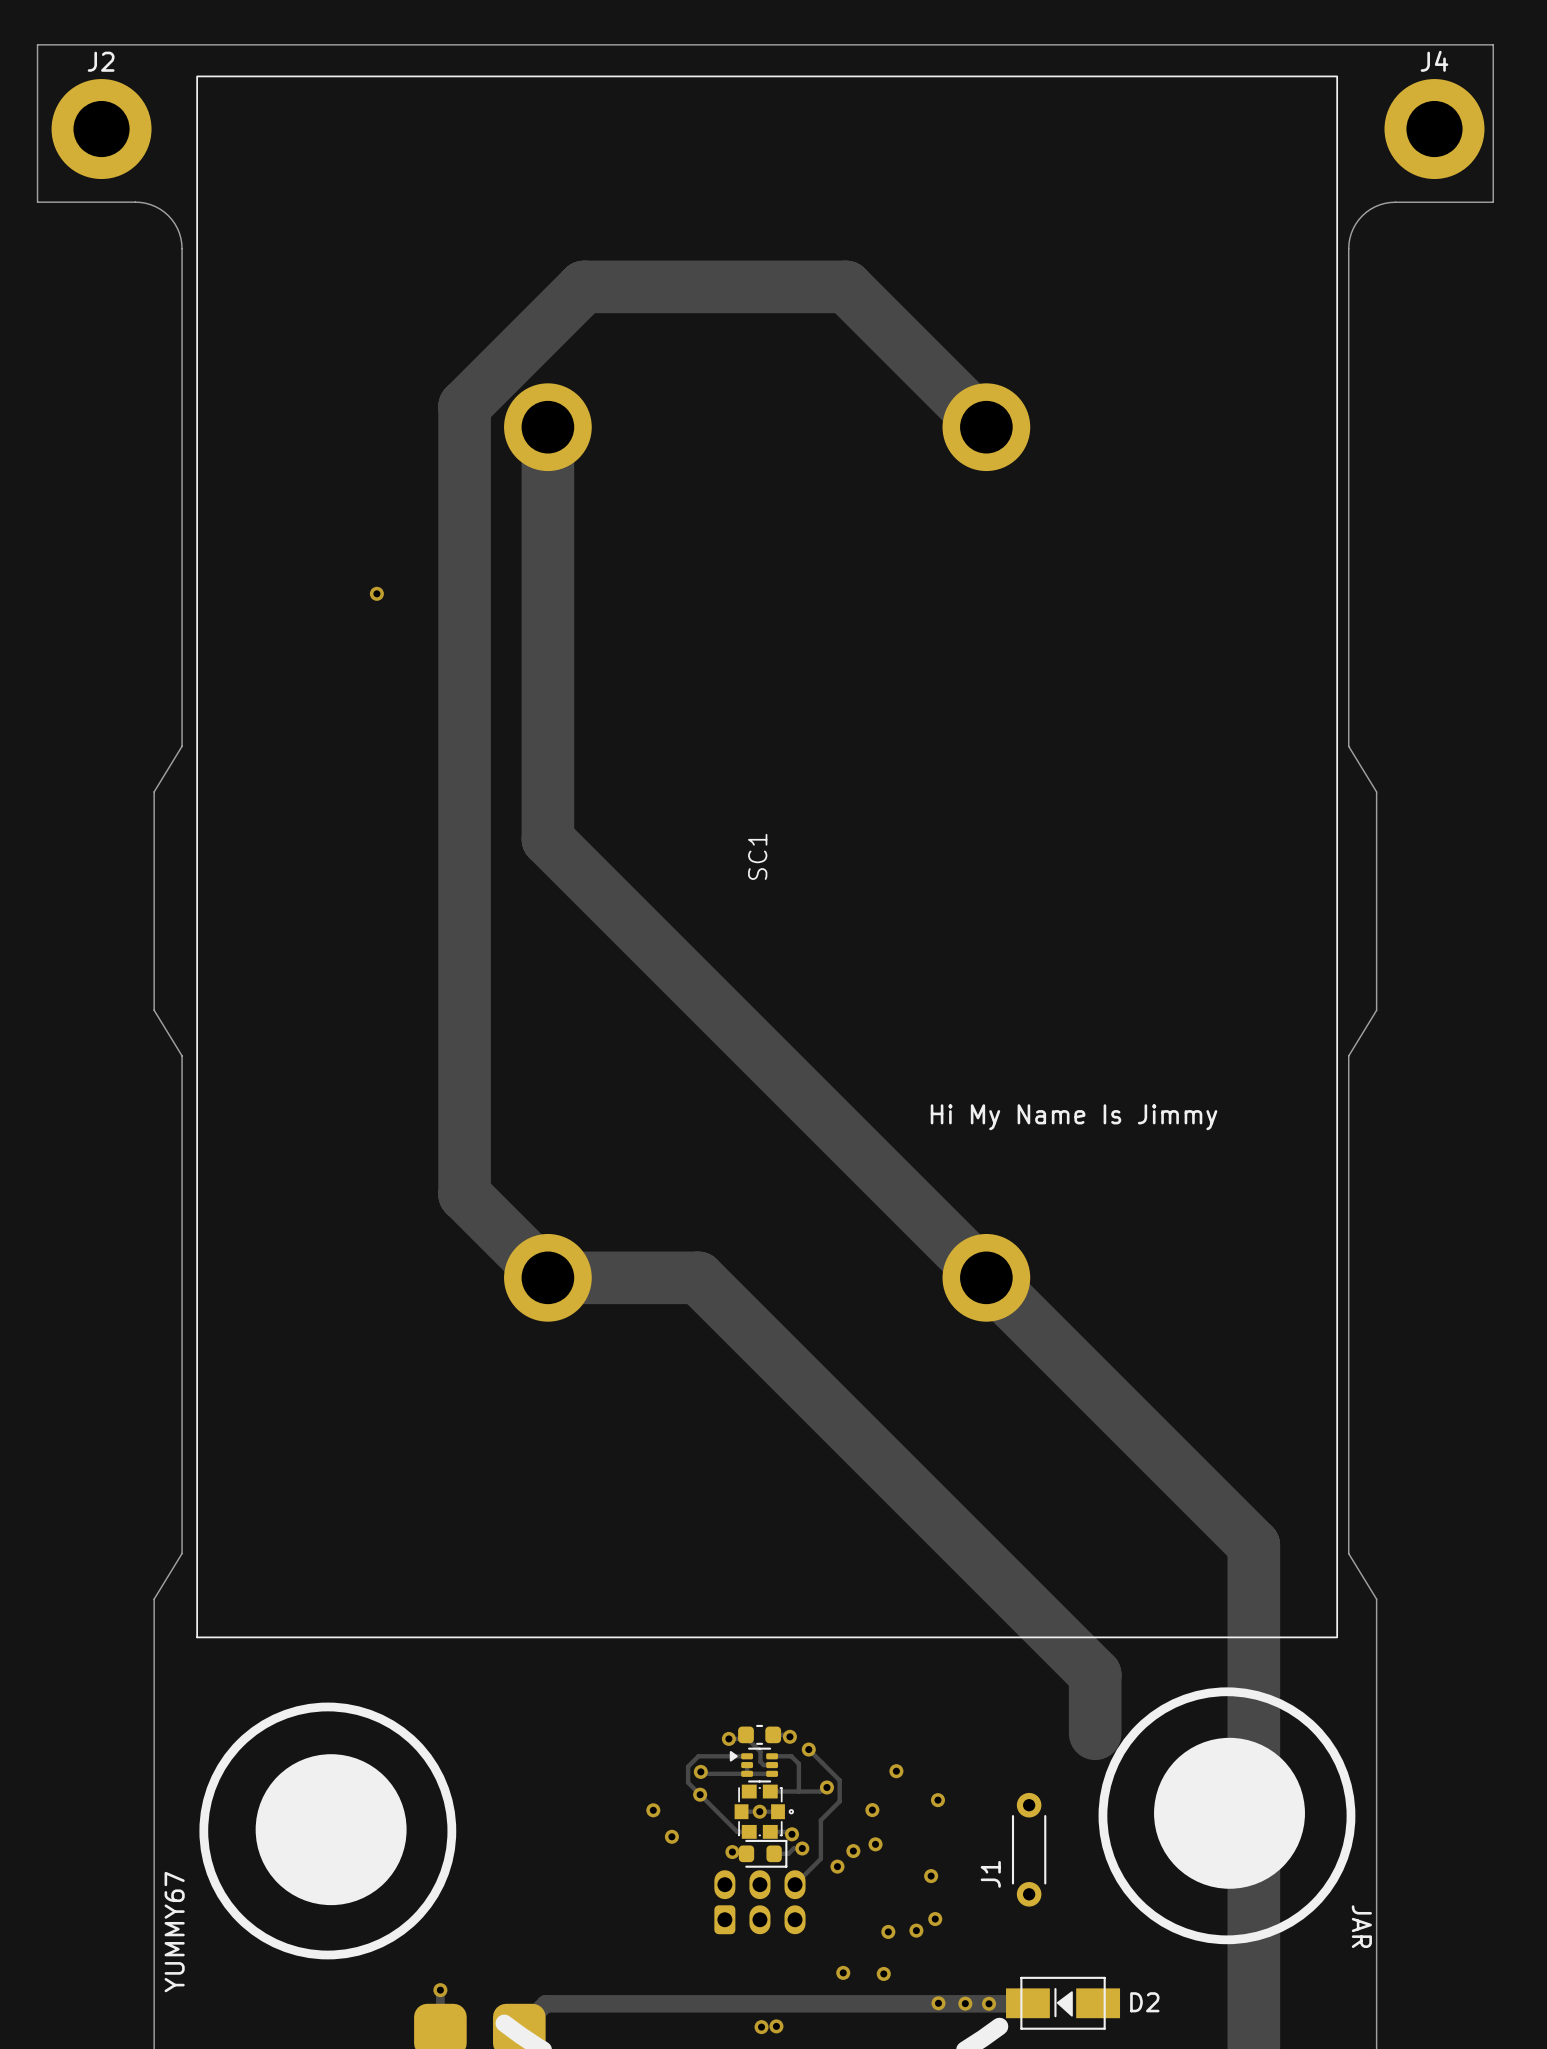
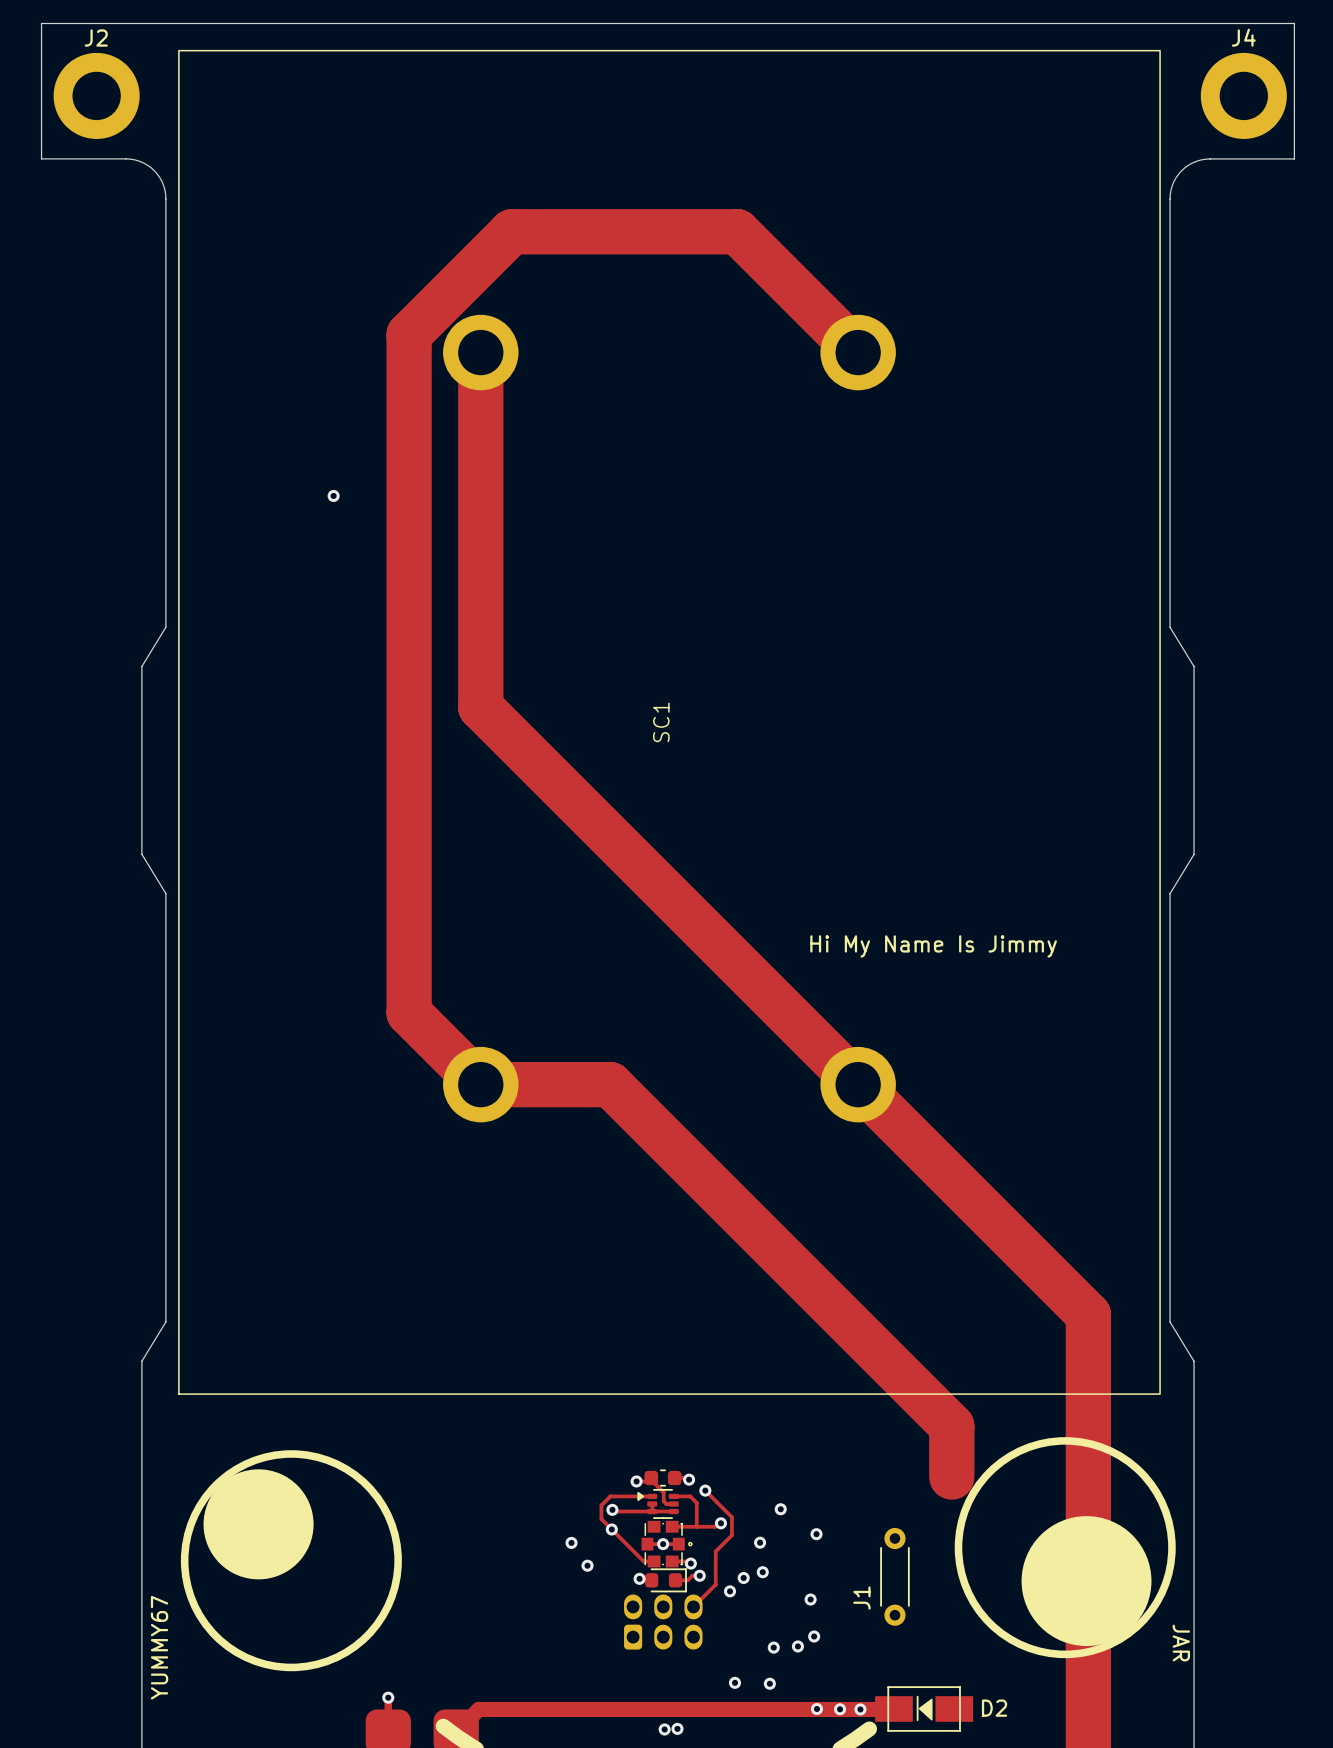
drawing: none -> [203, 1469, 314, 1580]
drawing: [255, 1754, 407, 1906] -> none
drawing position: (1229, 1813) -> (1086, 1581)

